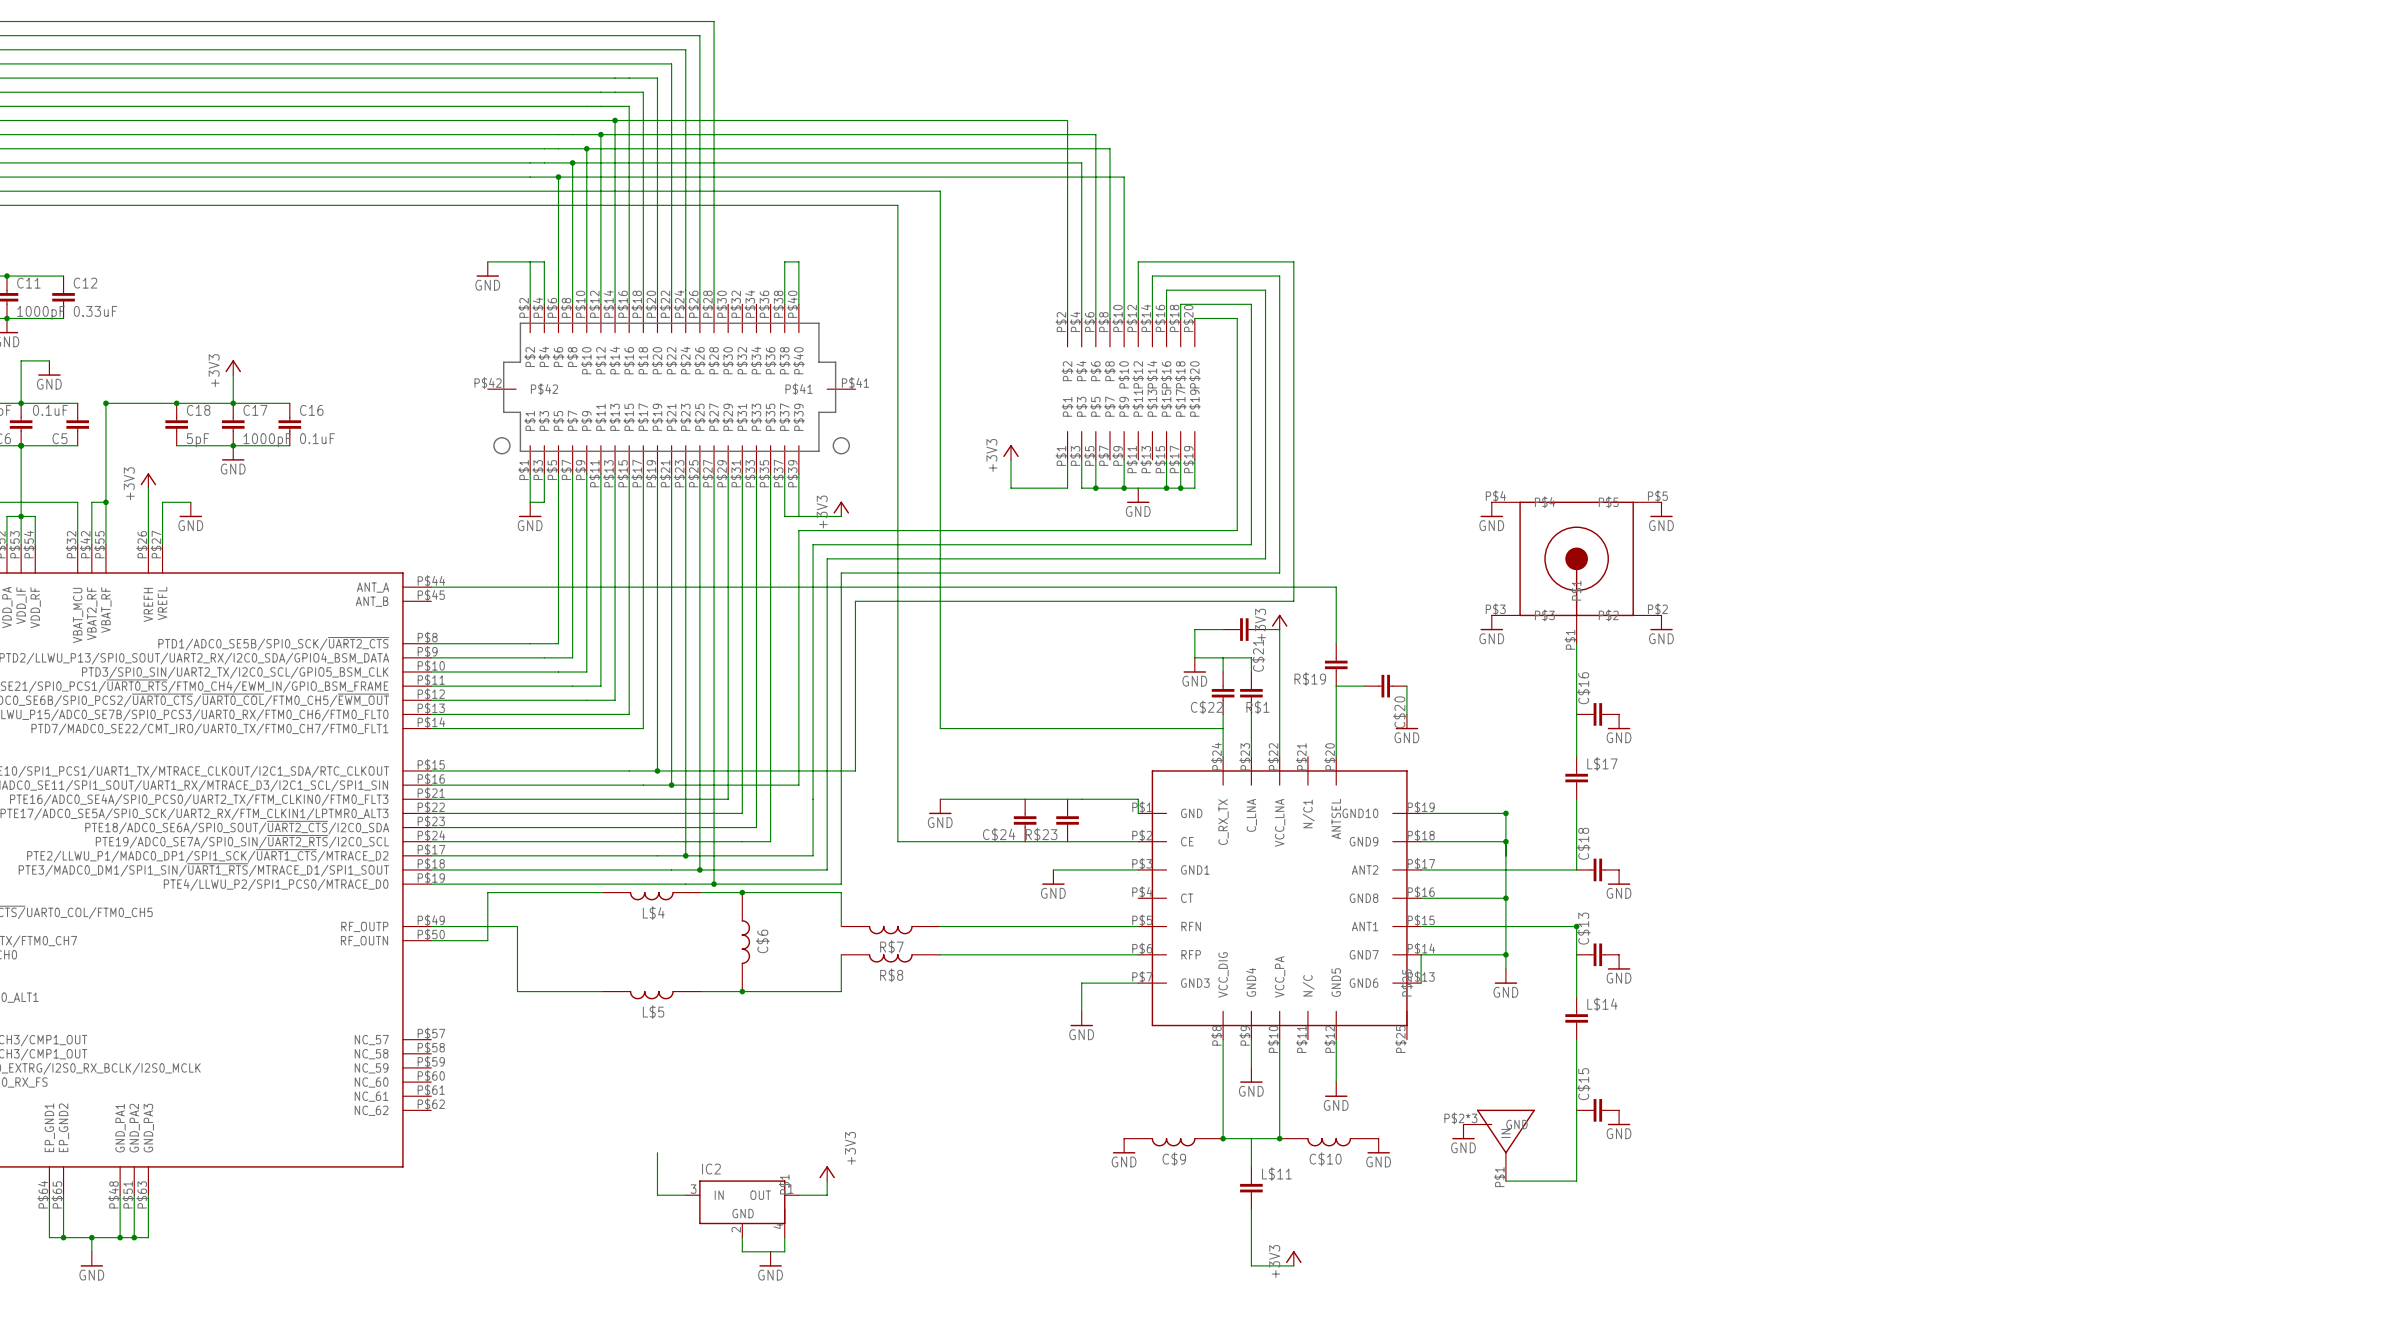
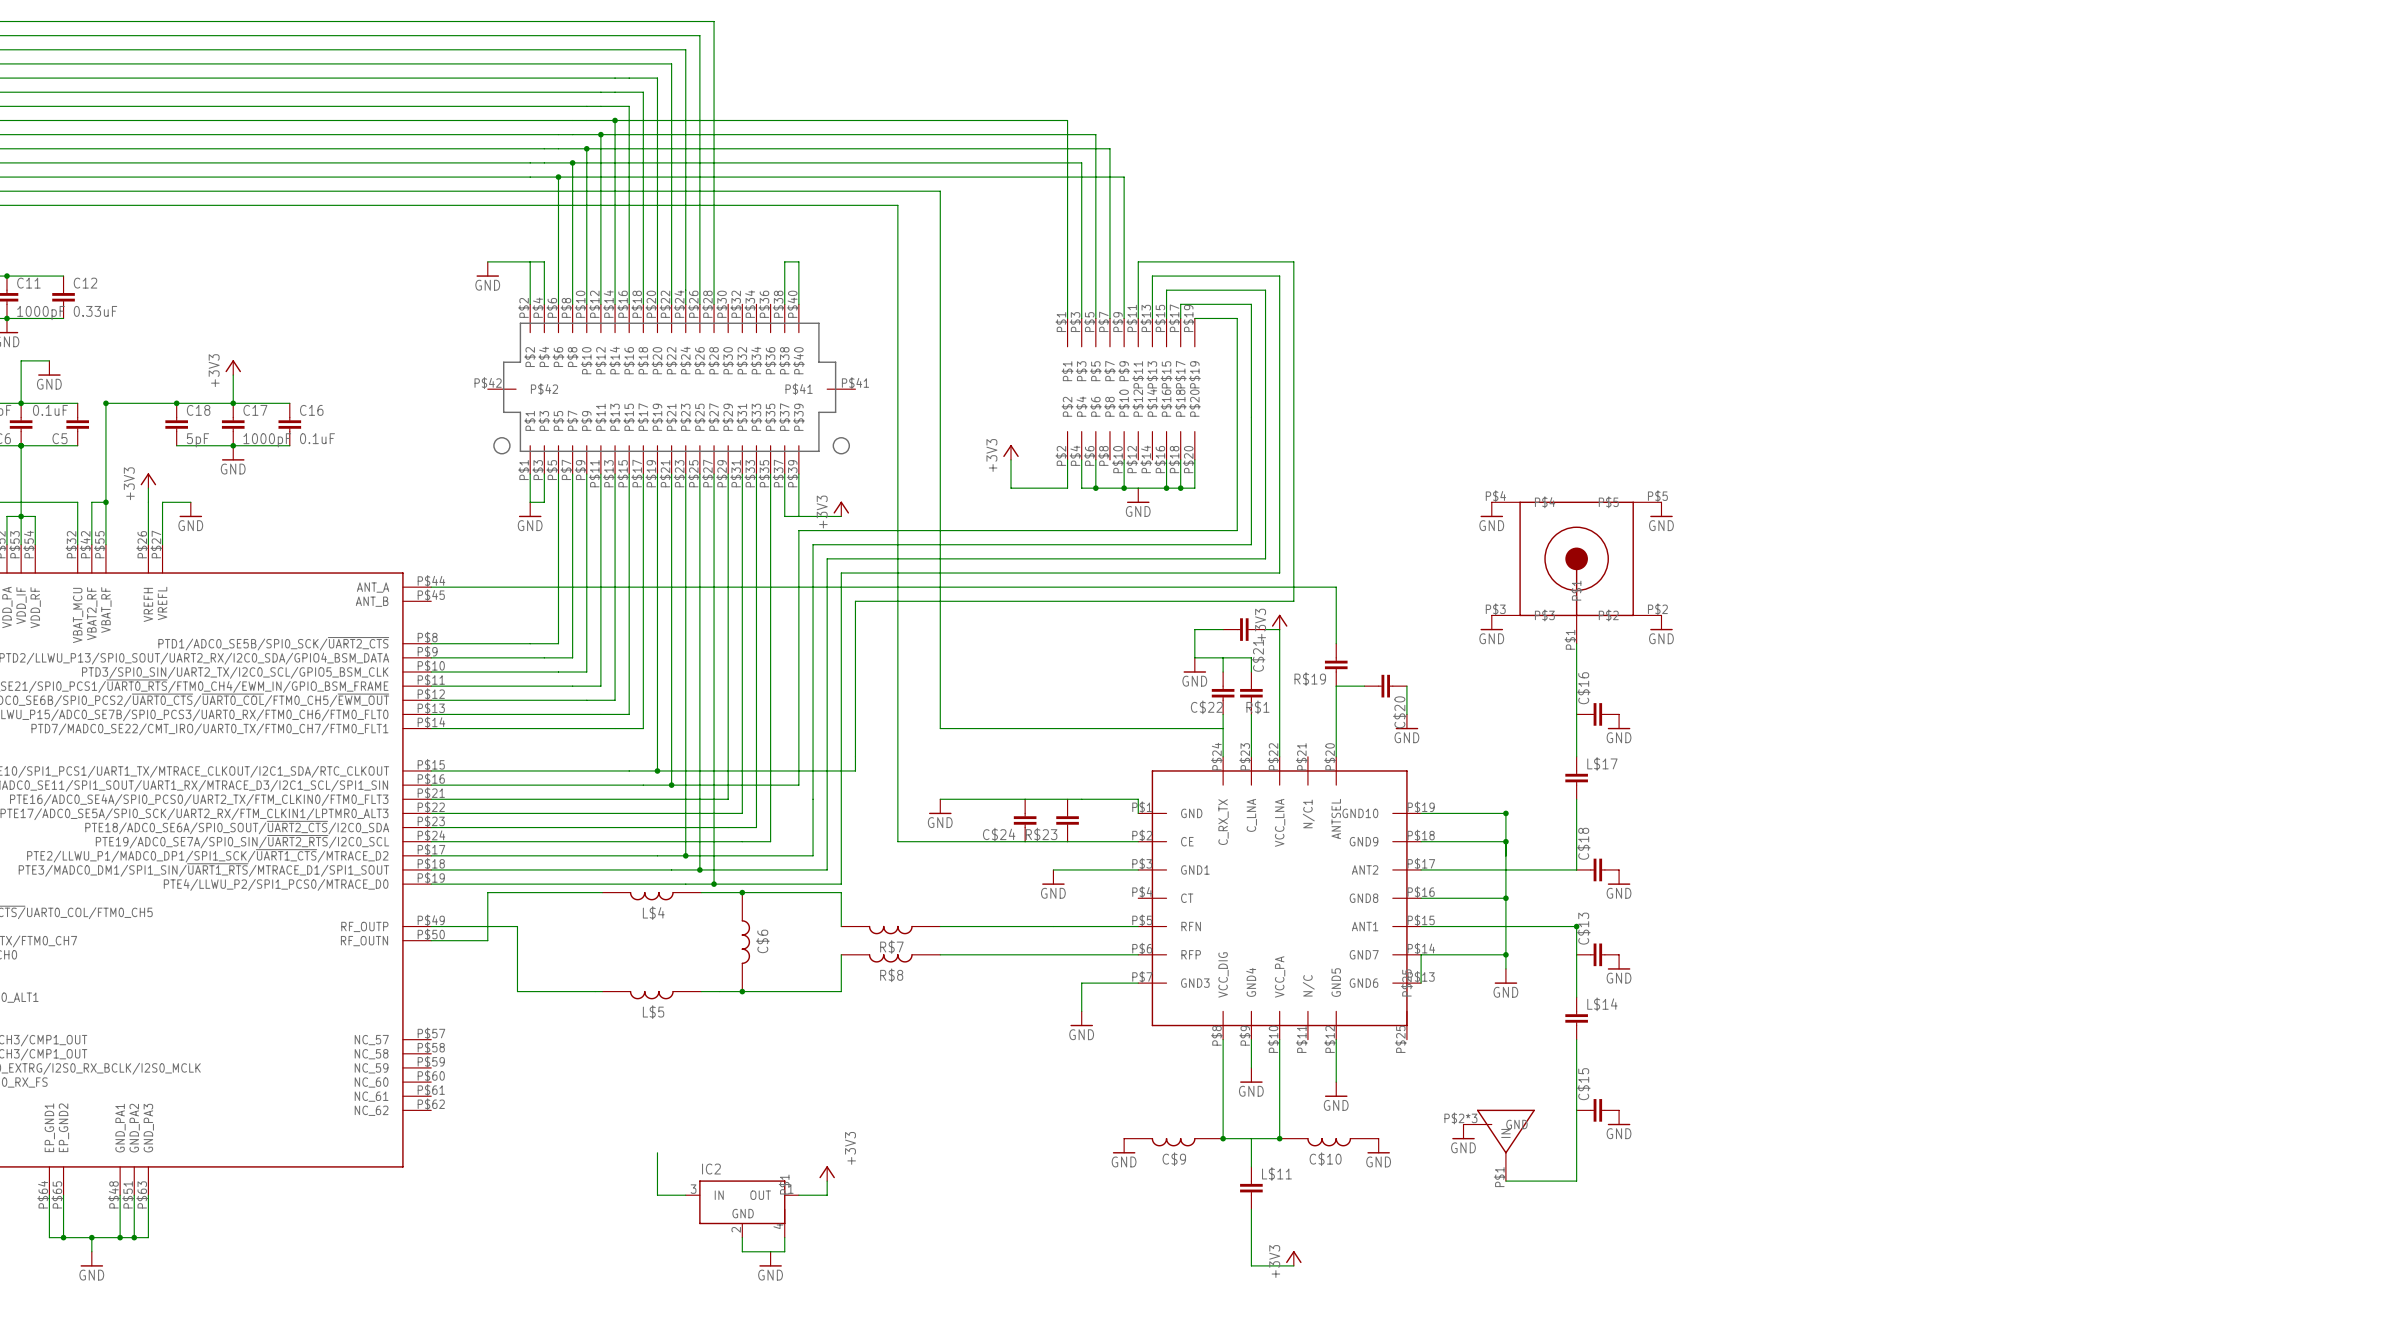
part flip: as is (1131, 389) -> up-down (1131, 389)

